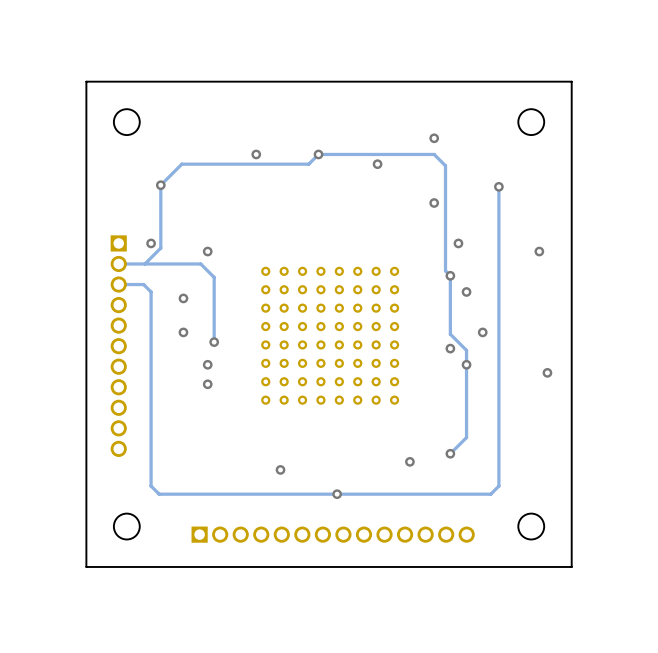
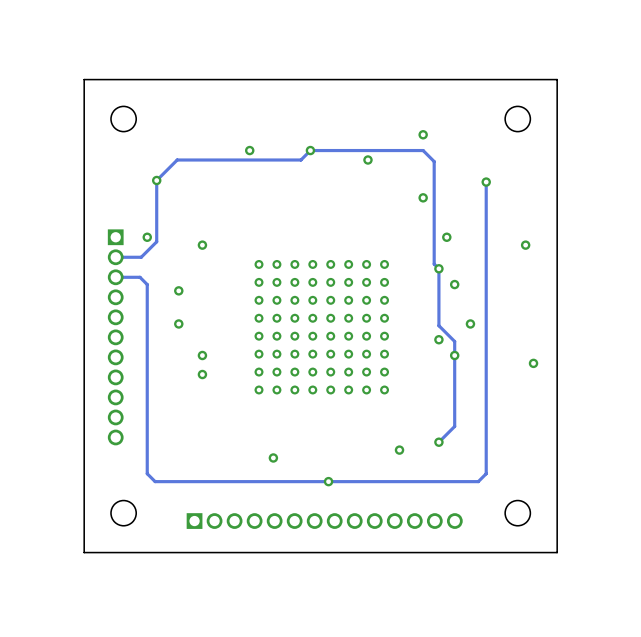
track: (144, 263) (200, 263) (214, 277) (214, 342) -> none
via: (214, 342) -> none

